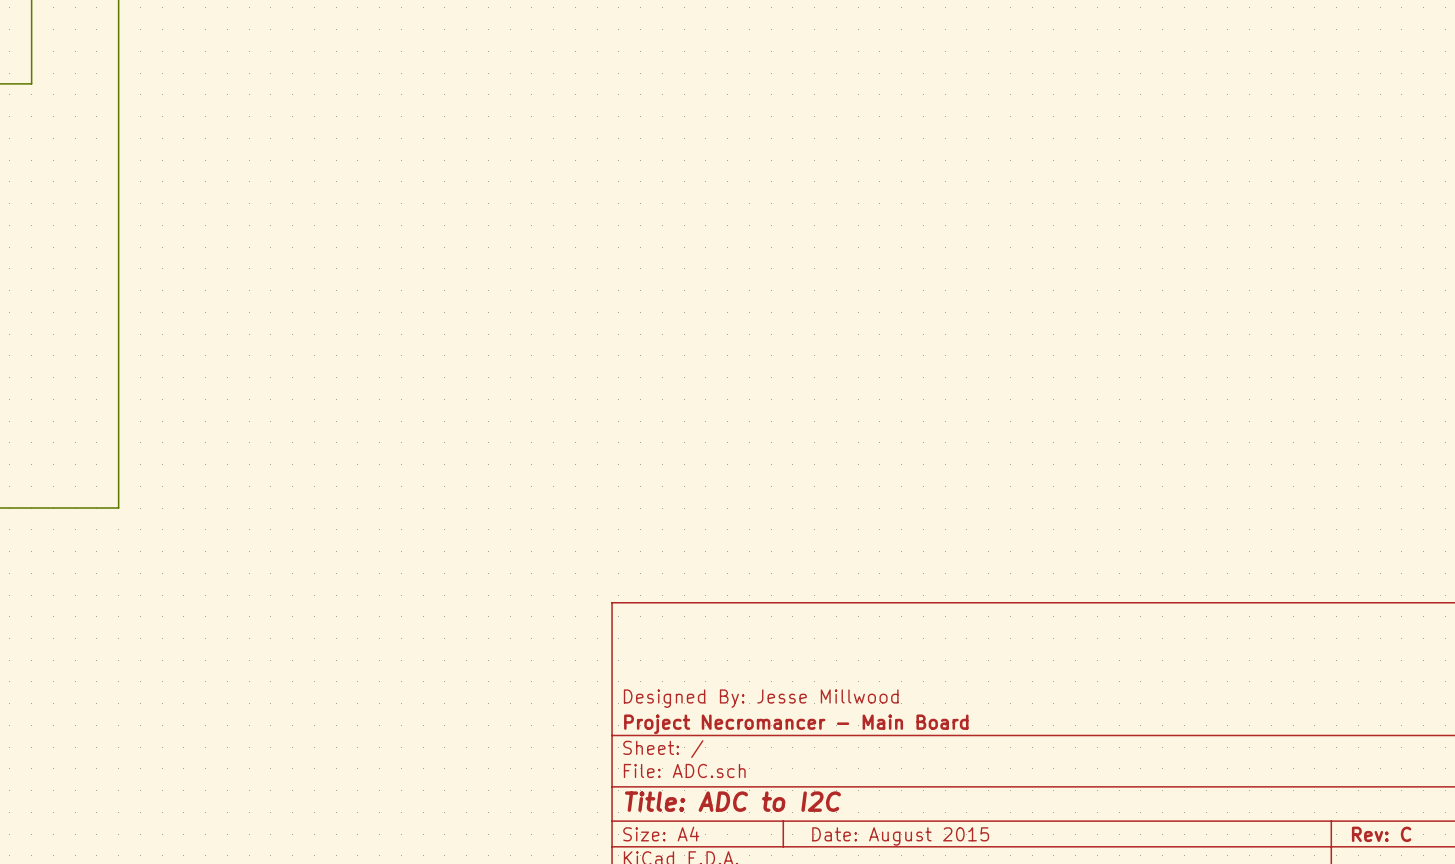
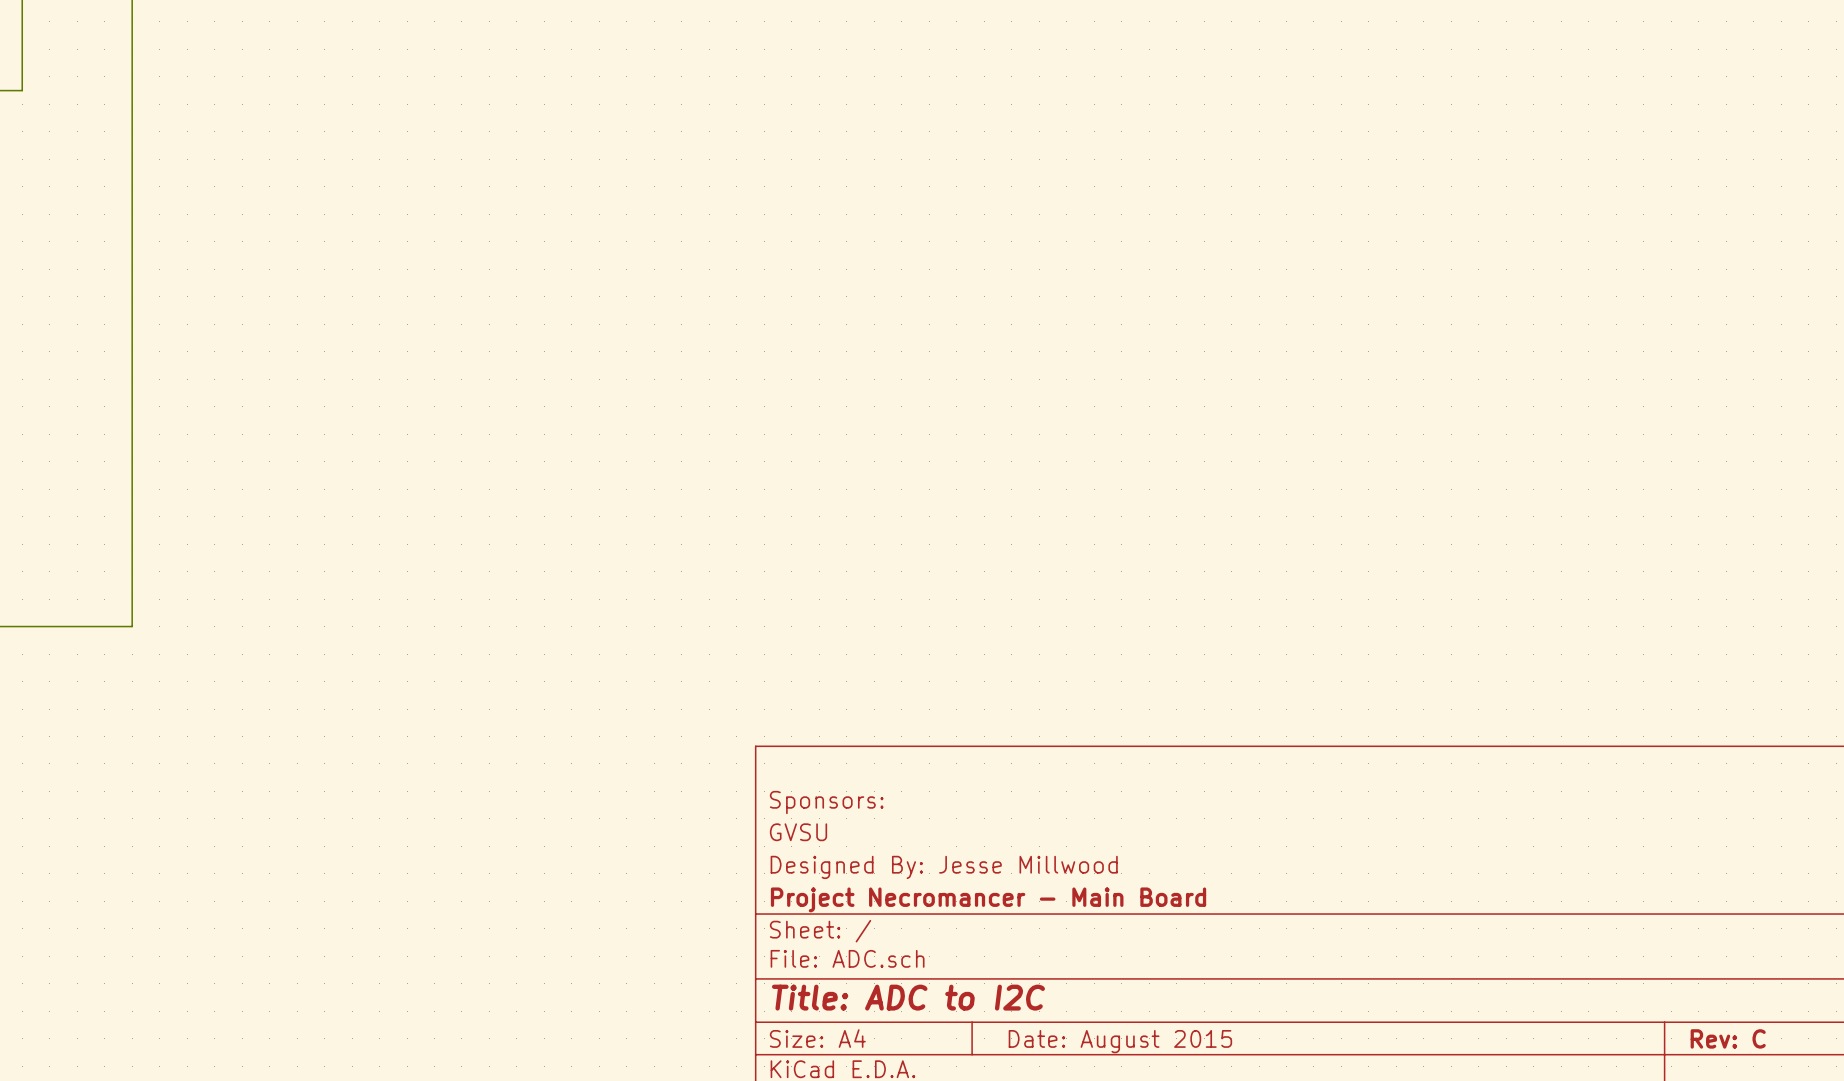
title block: none -> Sponsors: (826, 802)
title block: none -> GVSU (798, 832)

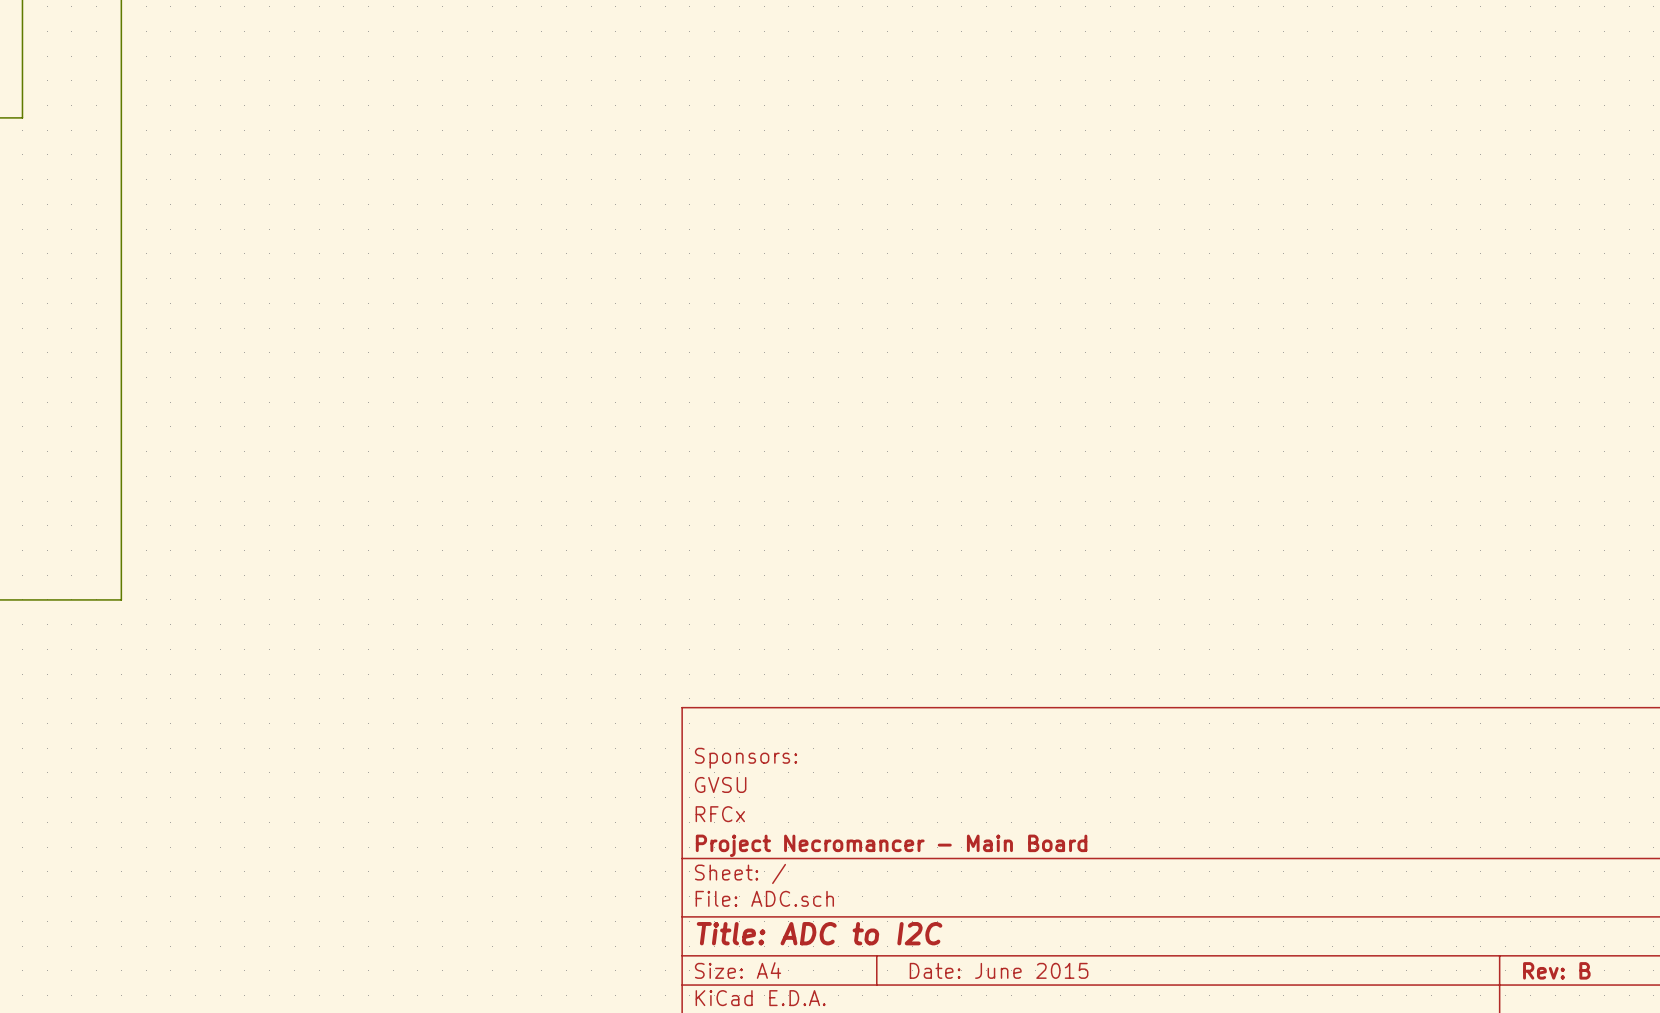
title block: Designed By: Jesse Millwood (944, 867) -> RFCx (720, 814)
title block: Rev: C (1728, 1038) -> Rev: B (1556, 970)
title block: Date: August 2015 (1120, 1041) -> Date: June 2015 (999, 970)

